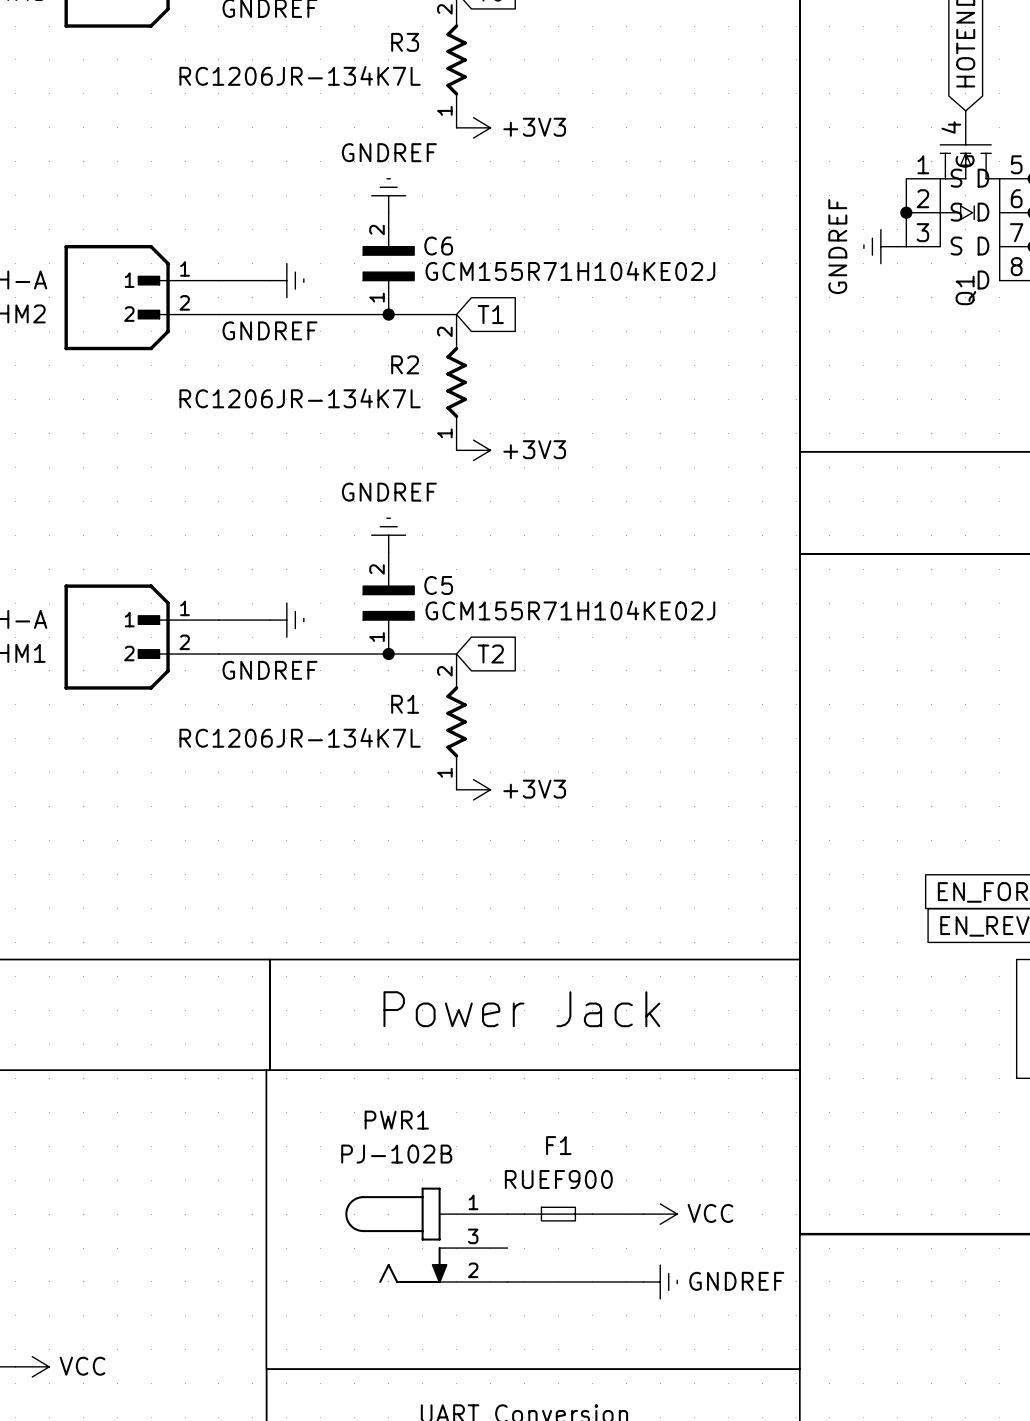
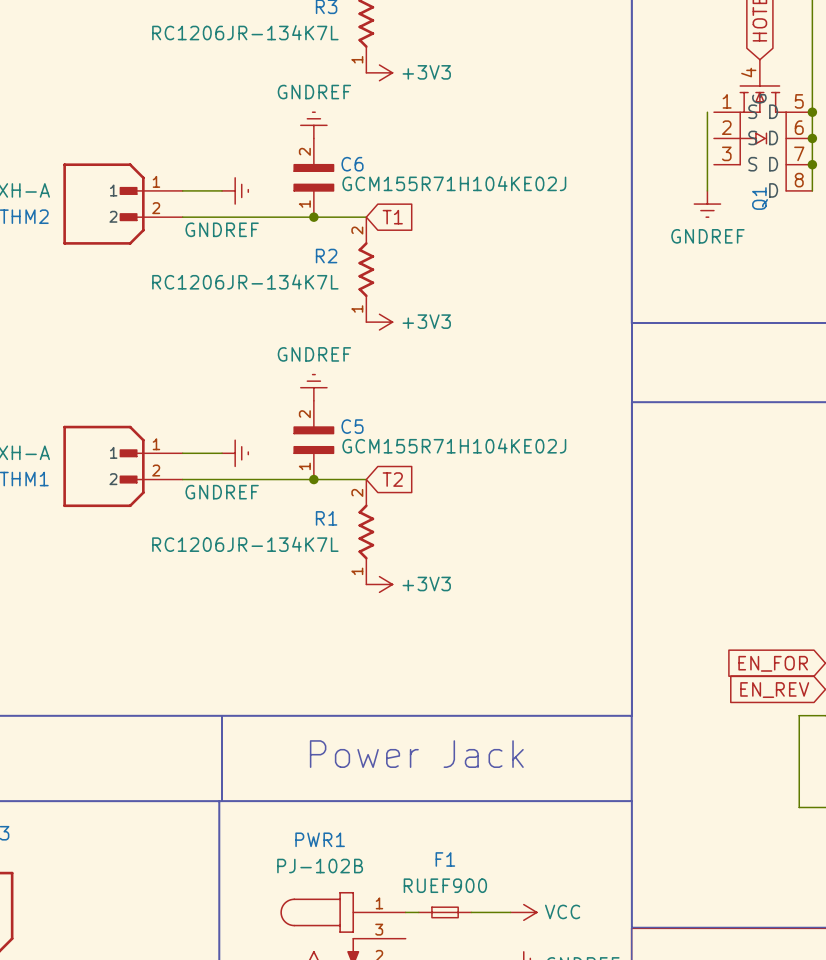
wire: none -> (707, 112) (707, 190)
wire: (906, 178) (906, 246) (897, 246) -> none
junction: (906, 212) -> none
power symbol rotation: 0° (880, 246) -> 90° counterclockwise (707, 204)
power symbol position: GNDREF (880, 246) -> GNDREF (707, 204)

